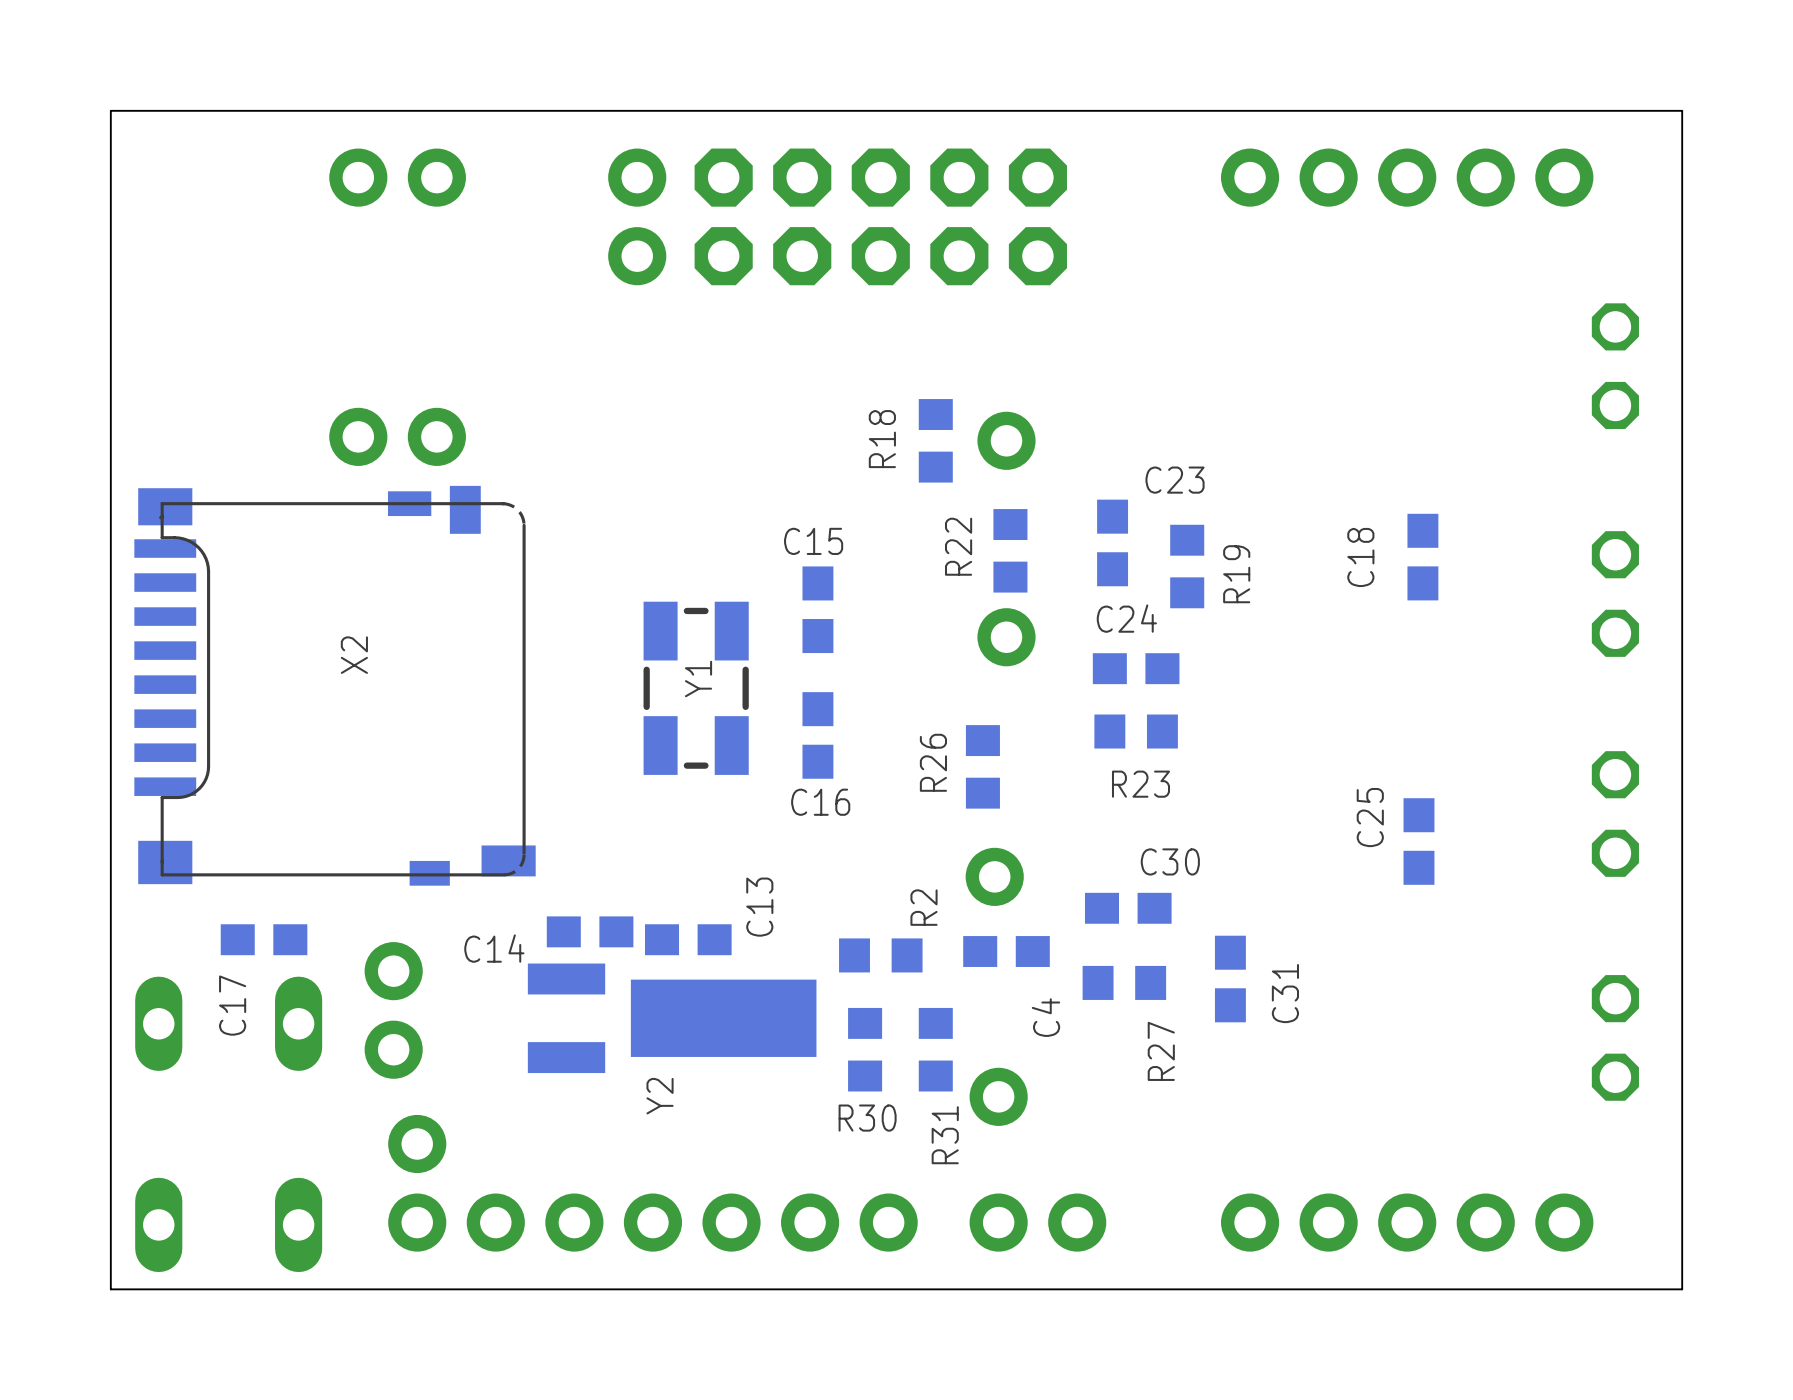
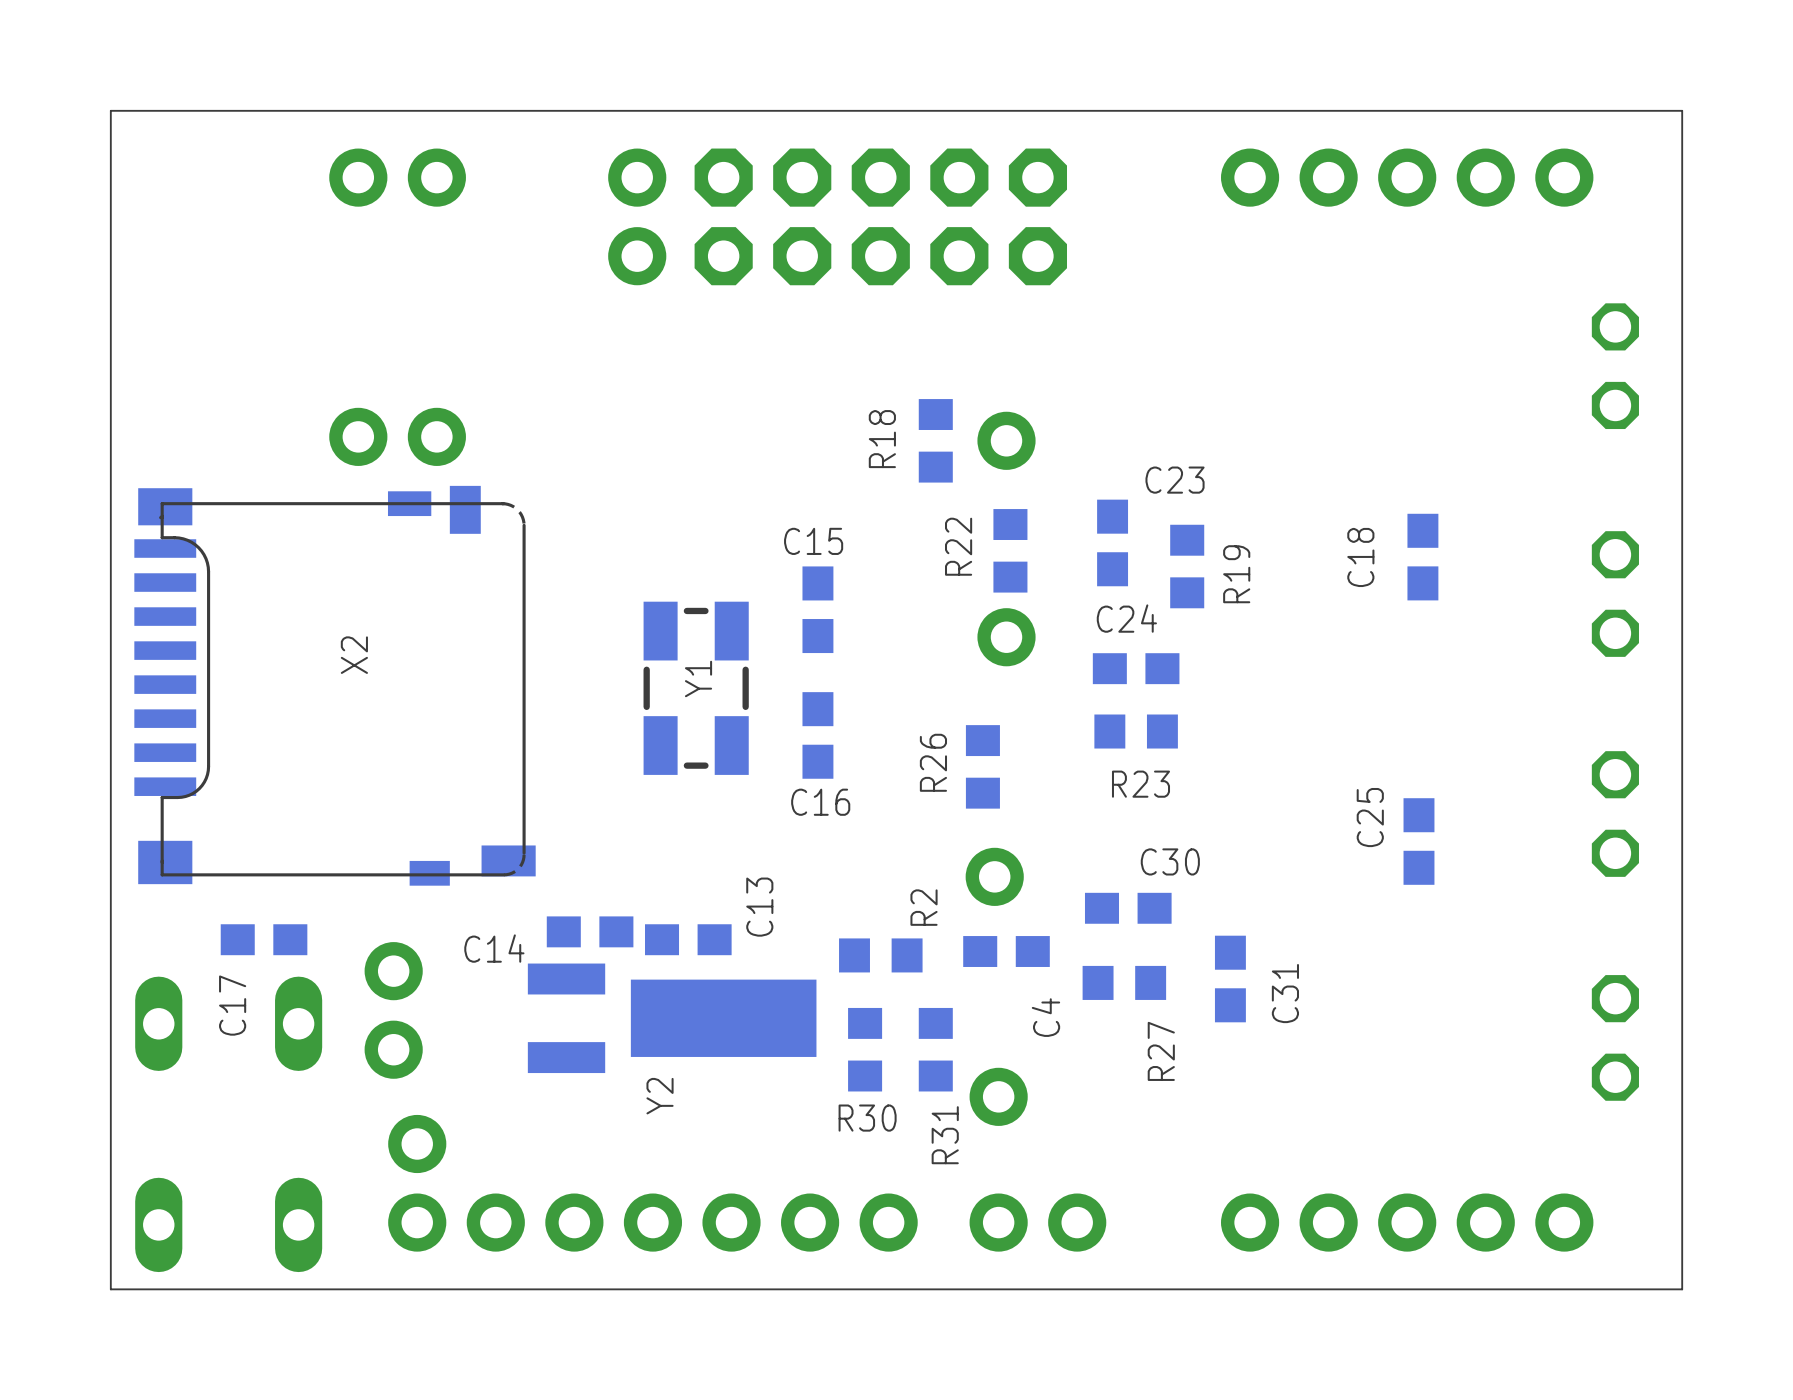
board edge: (1682, 110) (110, 110) (110, 1289) (1682, 1289) (1682, 110) -> none
line: none -> (1682, 110) (110, 110) (110, 1289) (1682, 1289) (1682, 110)

